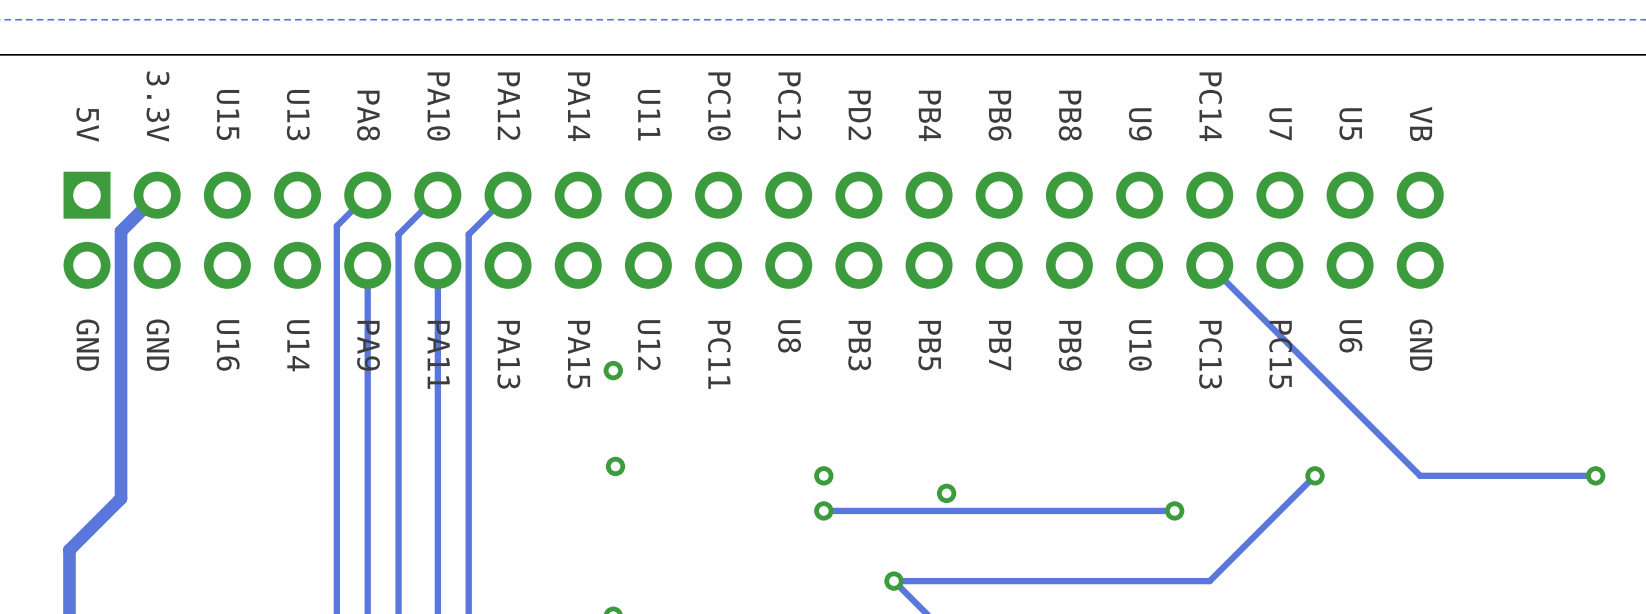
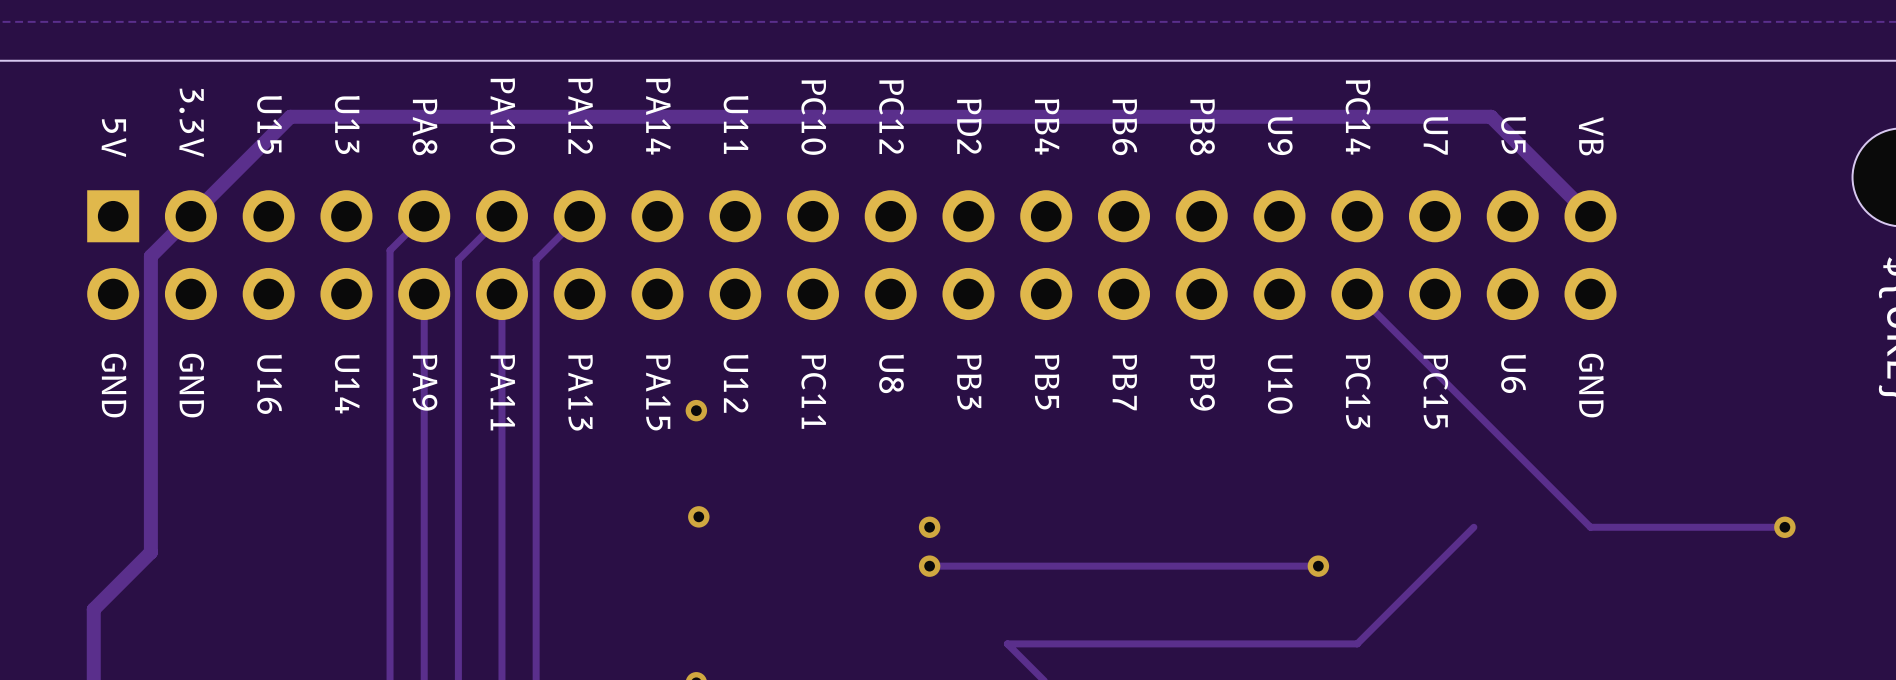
track: none -> (1590, 216) (1491, 116) (290, 116) (190, 216)
via: (1314, 475) -> none
via: (946, 493) -> none
via: (893, 581) -> none

